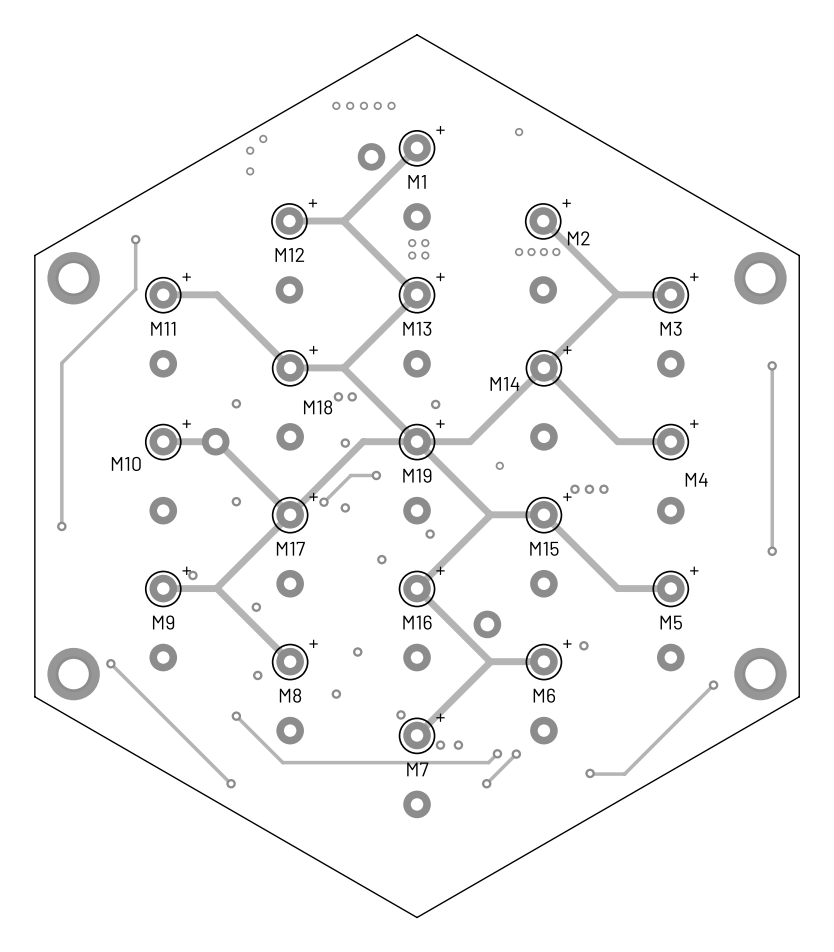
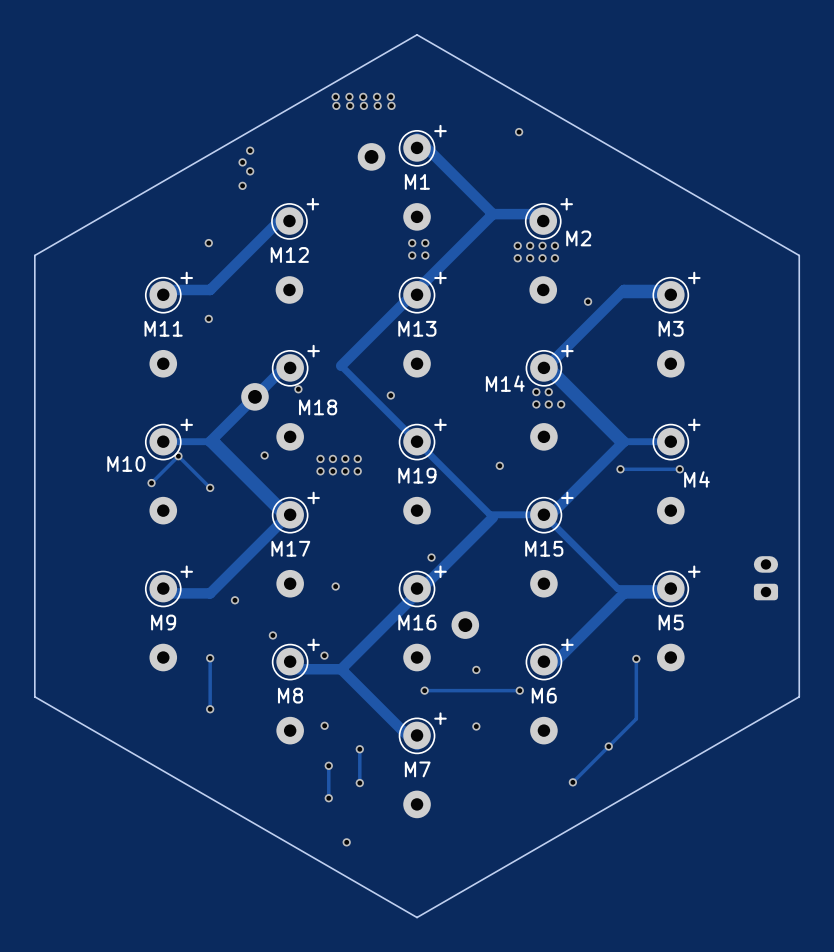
via: none -> (335, 96)
via: none -> (349, 96)
via: none -> (363, 96)
via: none -> (377, 96)
via: none -> (390, 96)
via: (263, 138) -> none
track: none -> (417, 138) (492, 214)
track: (417, 147) (343, 221) (289, 221) -> none
via: none -> (242, 162)
via: none -> (242, 185)
track: none -> (286, 214) (210, 289) (154, 289)
track: none -> (492, 214) (548, 214)
track: none -> (492, 214) (341, 365)
track: (343, 221) (417, 294) (343, 367) (290, 367) (217, 294) (163, 294) -> none
track: (543, 221) (617, 294) (470, 441) (363, 441) (216, 588) -> none
track: (135, 239) (135, 289) (61, 363) (61, 526) -> none
via: (135, 239) -> none
via: none -> (208, 243)
via: none -> (517, 245)
via: none -> (530, 245)
via: none -> (542, 245)
via: none -> (554, 245)
via: (519, 252) -> none
via: (531, 252) -> none
via: (543, 252) -> none
via: (556, 252) -> none
via: none -> (517, 258)
via: none -> (530, 258)
via: none -> (542, 258)
via: none -> (554, 258)
part: (73, 278) -> none
part: (760, 278) -> none
track: none -> (679, 289) (623, 289) (548, 365) (623, 441) (548, 517)
via: none -> (588, 301)
via: none -> (208, 318)
track: none -> (286, 365) (210, 441) (286, 517) (210, 593) (154, 593)
track: (772, 365) (772, 551) -> none
via: (772, 365) -> none
via: none -> (298, 389)
via: none -> (536, 392)
via: none -> (548, 392)
via: none -> (390, 395)
via: (338, 396) -> none
via: (352, 396) -> none
via: (236, 403) -> none
via: (435, 404) -> none
via: none -> (536, 404)
via: none -> (548, 404)
via: none -> (561, 404)
part position: (215, 441) -> (254, 396)
via: (345, 443) -> none
via: none -> (264, 455)
via: none -> (178, 456)
via: none -> (320, 458)
via: none -> (332, 458)
via: none -> (345, 458)
via: none -> (357, 458)
track: none -> (620, 469) (679, 469)
via: none -> (620, 469)
via: none -> (679, 469)
via: none -> (320, 471)
via: none -> (332, 471)
via: none -> (345, 471)
via: none -> (357, 471)
track: (376, 475) (350, 475) (324, 502) -> none
via: (376, 475) -> none
track: none -> (151, 483) (178, 456) (210, 487)
via: none -> (151, 483)
via: none -> (210, 487)
via: (574, 489) -> none
via: (589, 489) -> none
via: (603, 489) -> none
via: (236, 501) -> none
via: (323, 502) -> none
via: (345, 507) -> none
track: (489, 513) (489, 516) (417, 588) (490, 661) -> none
track: none -> (492, 517) (341, 669)
via: (61, 526) -> none
via: (430, 534) -> none
via: (772, 551) -> none
via: none -> (431, 557)
via: (381, 559) -> none
via: (192, 575) -> none
part: none -> (765, 578)
via: none -> (335, 586)
track: (163, 588) (217, 588) (290, 661) -> none
track: none -> (679, 593) (623, 593) (548, 669)
via: none -> (234, 600)
via: (256, 607) -> none
part position: (487, 624) -> (465, 625)
via: none -> (272, 635)
via: (583, 645) -> none
via: (357, 652) -> none
via: none -> (324, 655)
track: none -> (210, 658) (210, 709)
via: none -> (210, 658)
track: none -> (636, 658) (636, 718) (572, 782)
via: none -> (636, 658)
track: (490, 661) (417, 735) -> none
track: (490, 661) (543, 661) -> none
track: (110, 663) (230, 783) -> none
via: (110, 663) -> none
track: none -> (286, 669) (341, 669)
track: none -> (341, 669) (417, 745)
via: none -> (476, 669)
part: (73, 674) -> none
part: (760, 674) -> none
via: (257, 675) -> none
track: (713, 685) (624, 774) (590, 773) -> none
via: (713, 685) -> none
track: none -> (424, 690) (519, 690)
via: none -> (424, 690)
via: none -> (519, 690)
via: (336, 694) -> none
via: none -> (210, 709)
via: (401, 714) -> none
track: (236, 716) (282, 762) (488, 762) (497, 753) -> none
via: (236, 716) -> none
via: none -> (324, 725)
via: none -> (476, 726)
via: (440, 745) -> none
via: (458, 745) -> none
via: none -> (608, 746)
track: none -> (359, 749) (359, 783)
via: none -> (359, 749)
via: (497, 753) -> none
track: (516, 754) (486, 783) -> none
via: (516, 754) -> none
track: none -> (328, 765) (328, 798)
via: none -> (328, 765)
via: (590, 773) -> none
via: none -> (572, 782)
via: (231, 783) -> none
via: none -> (359, 783)
via: (486, 783) -> none
via: none -> (328, 798)
via: none -> (346, 842)

